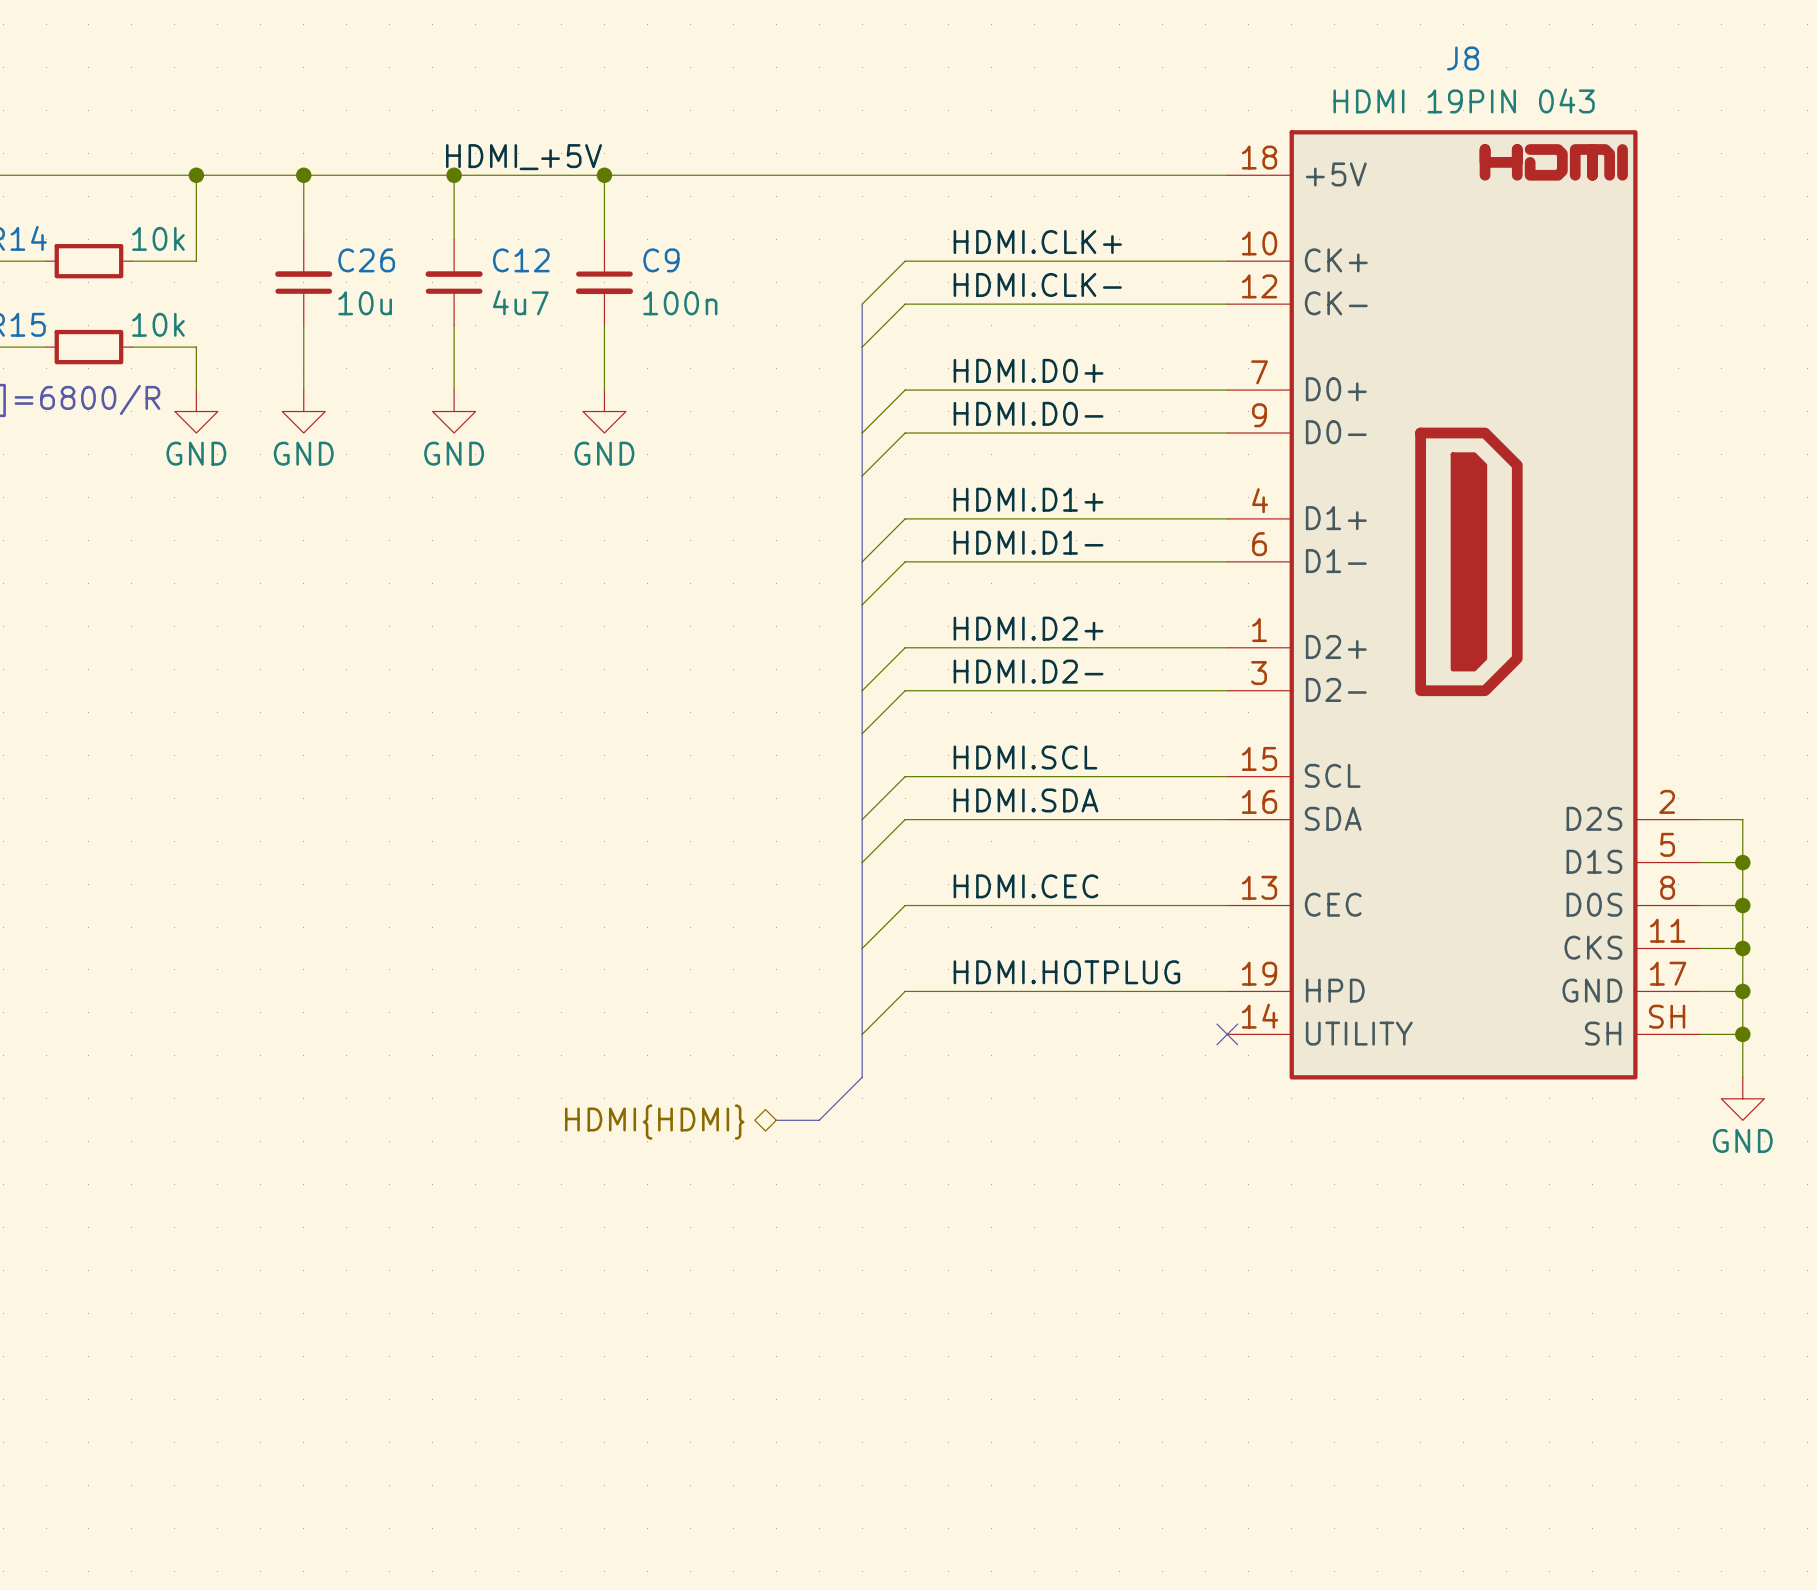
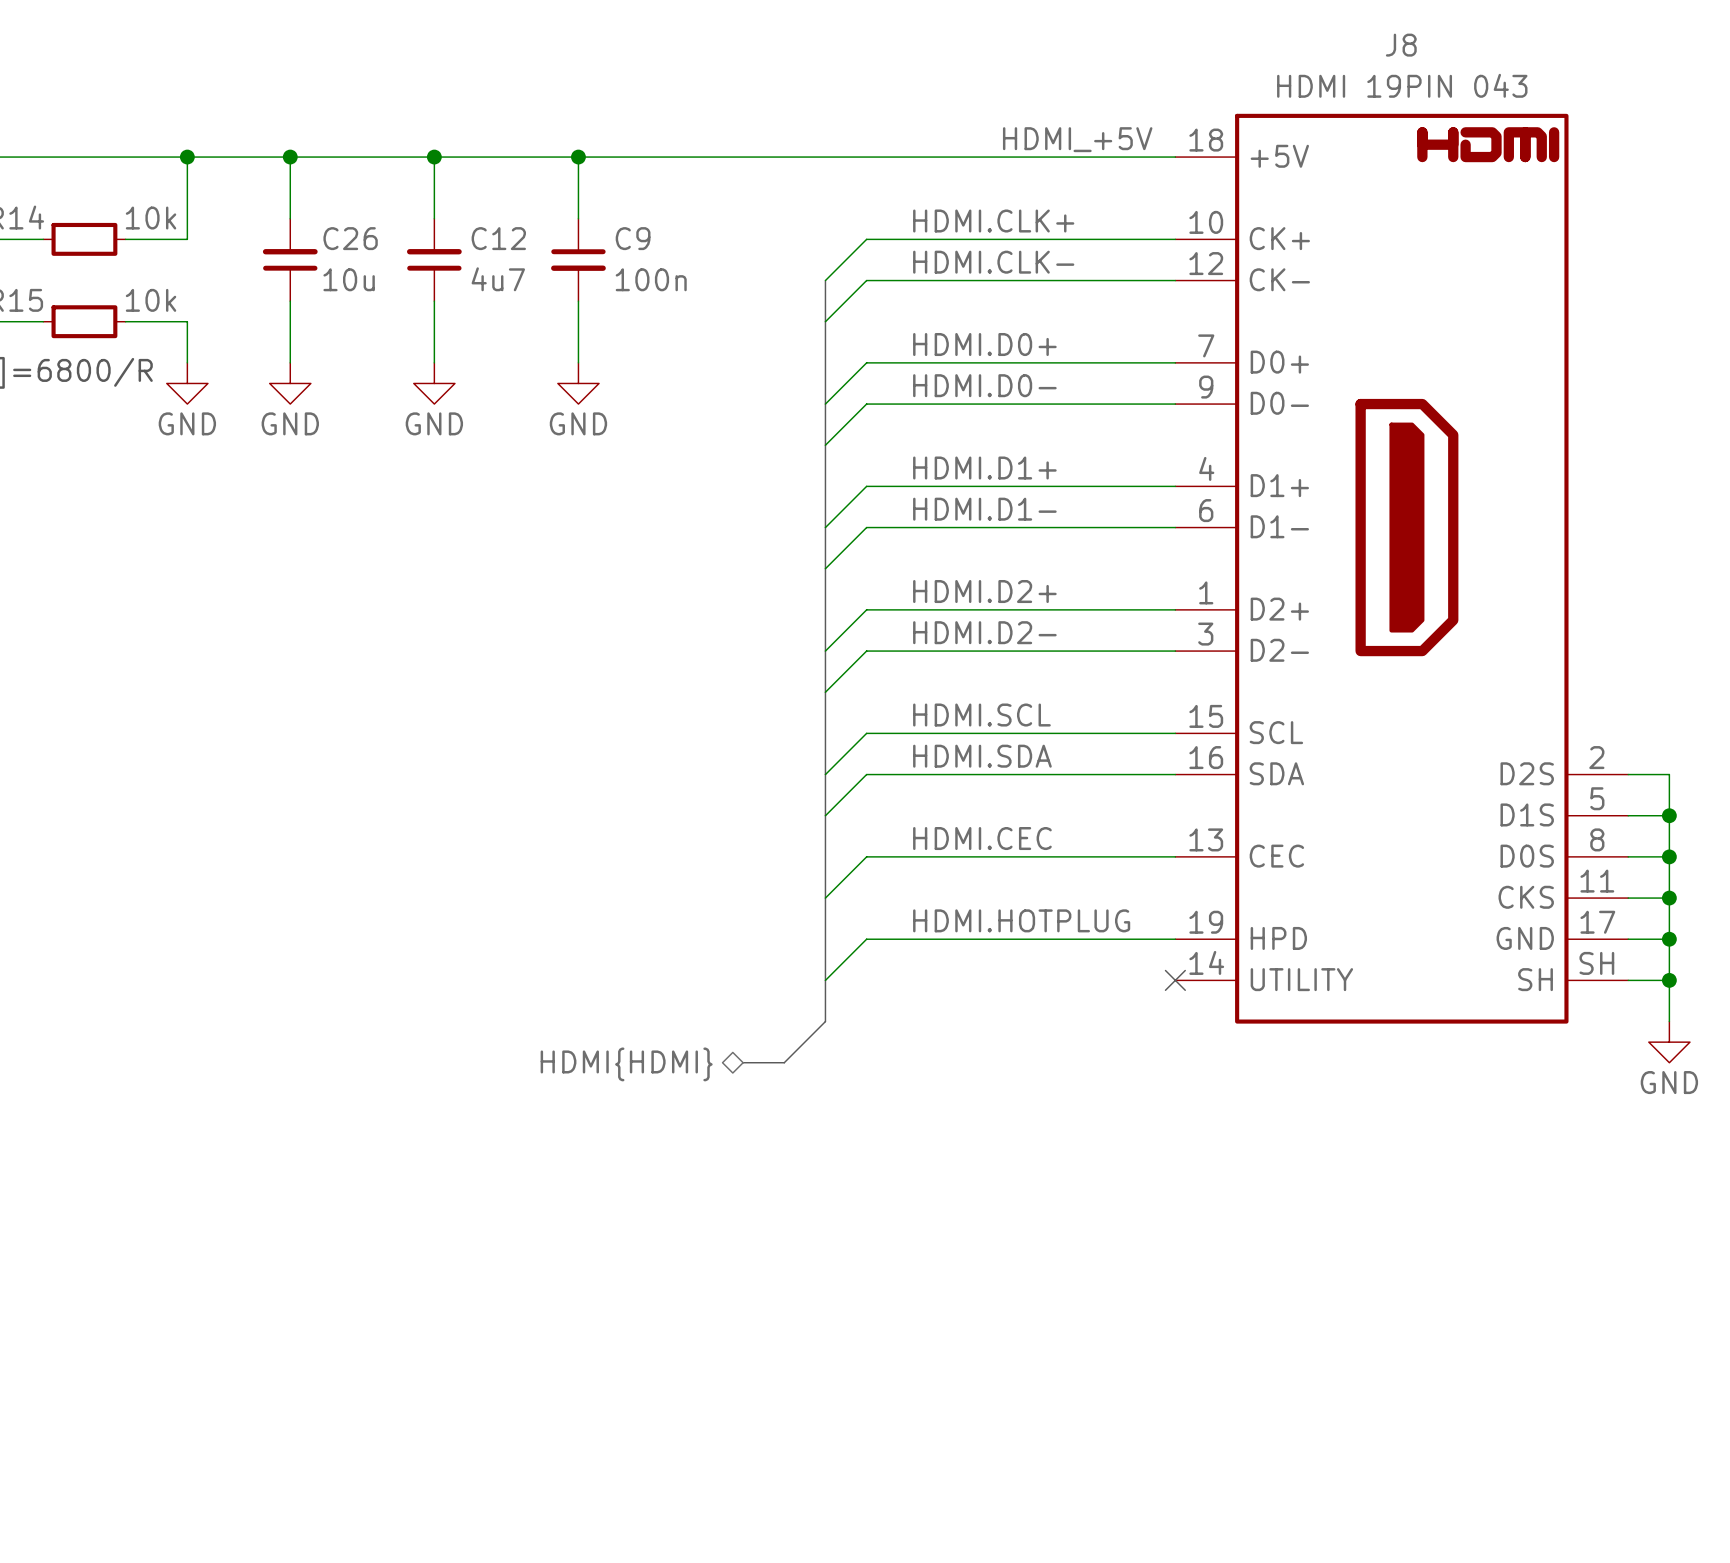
label: HDMI_+5V (524, 157) -> none
label: none -> HDMI_+5V (1077, 139)

